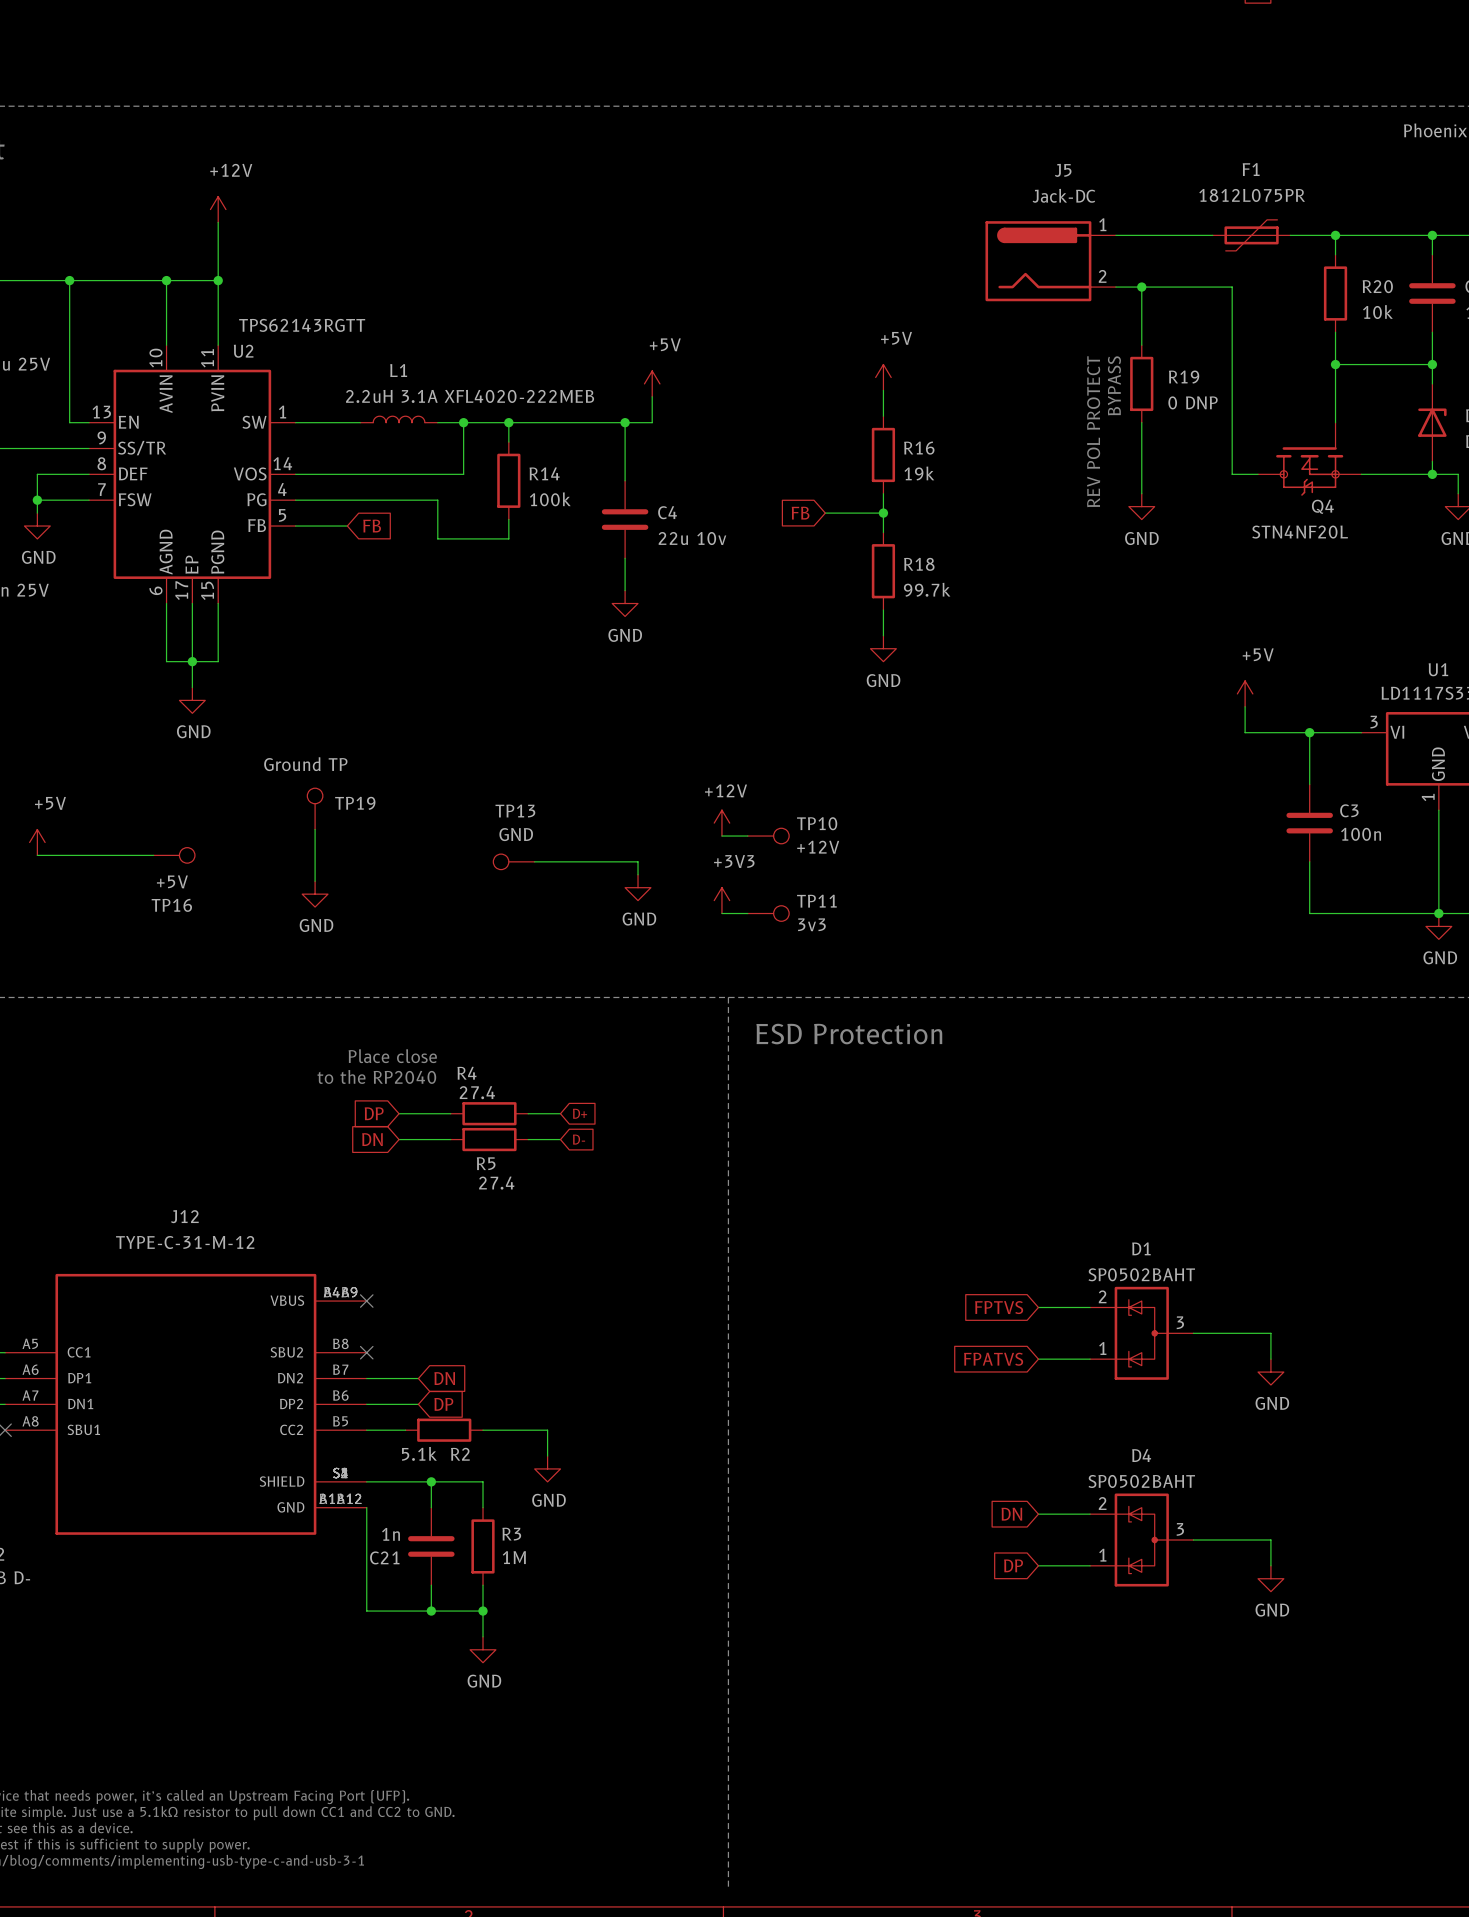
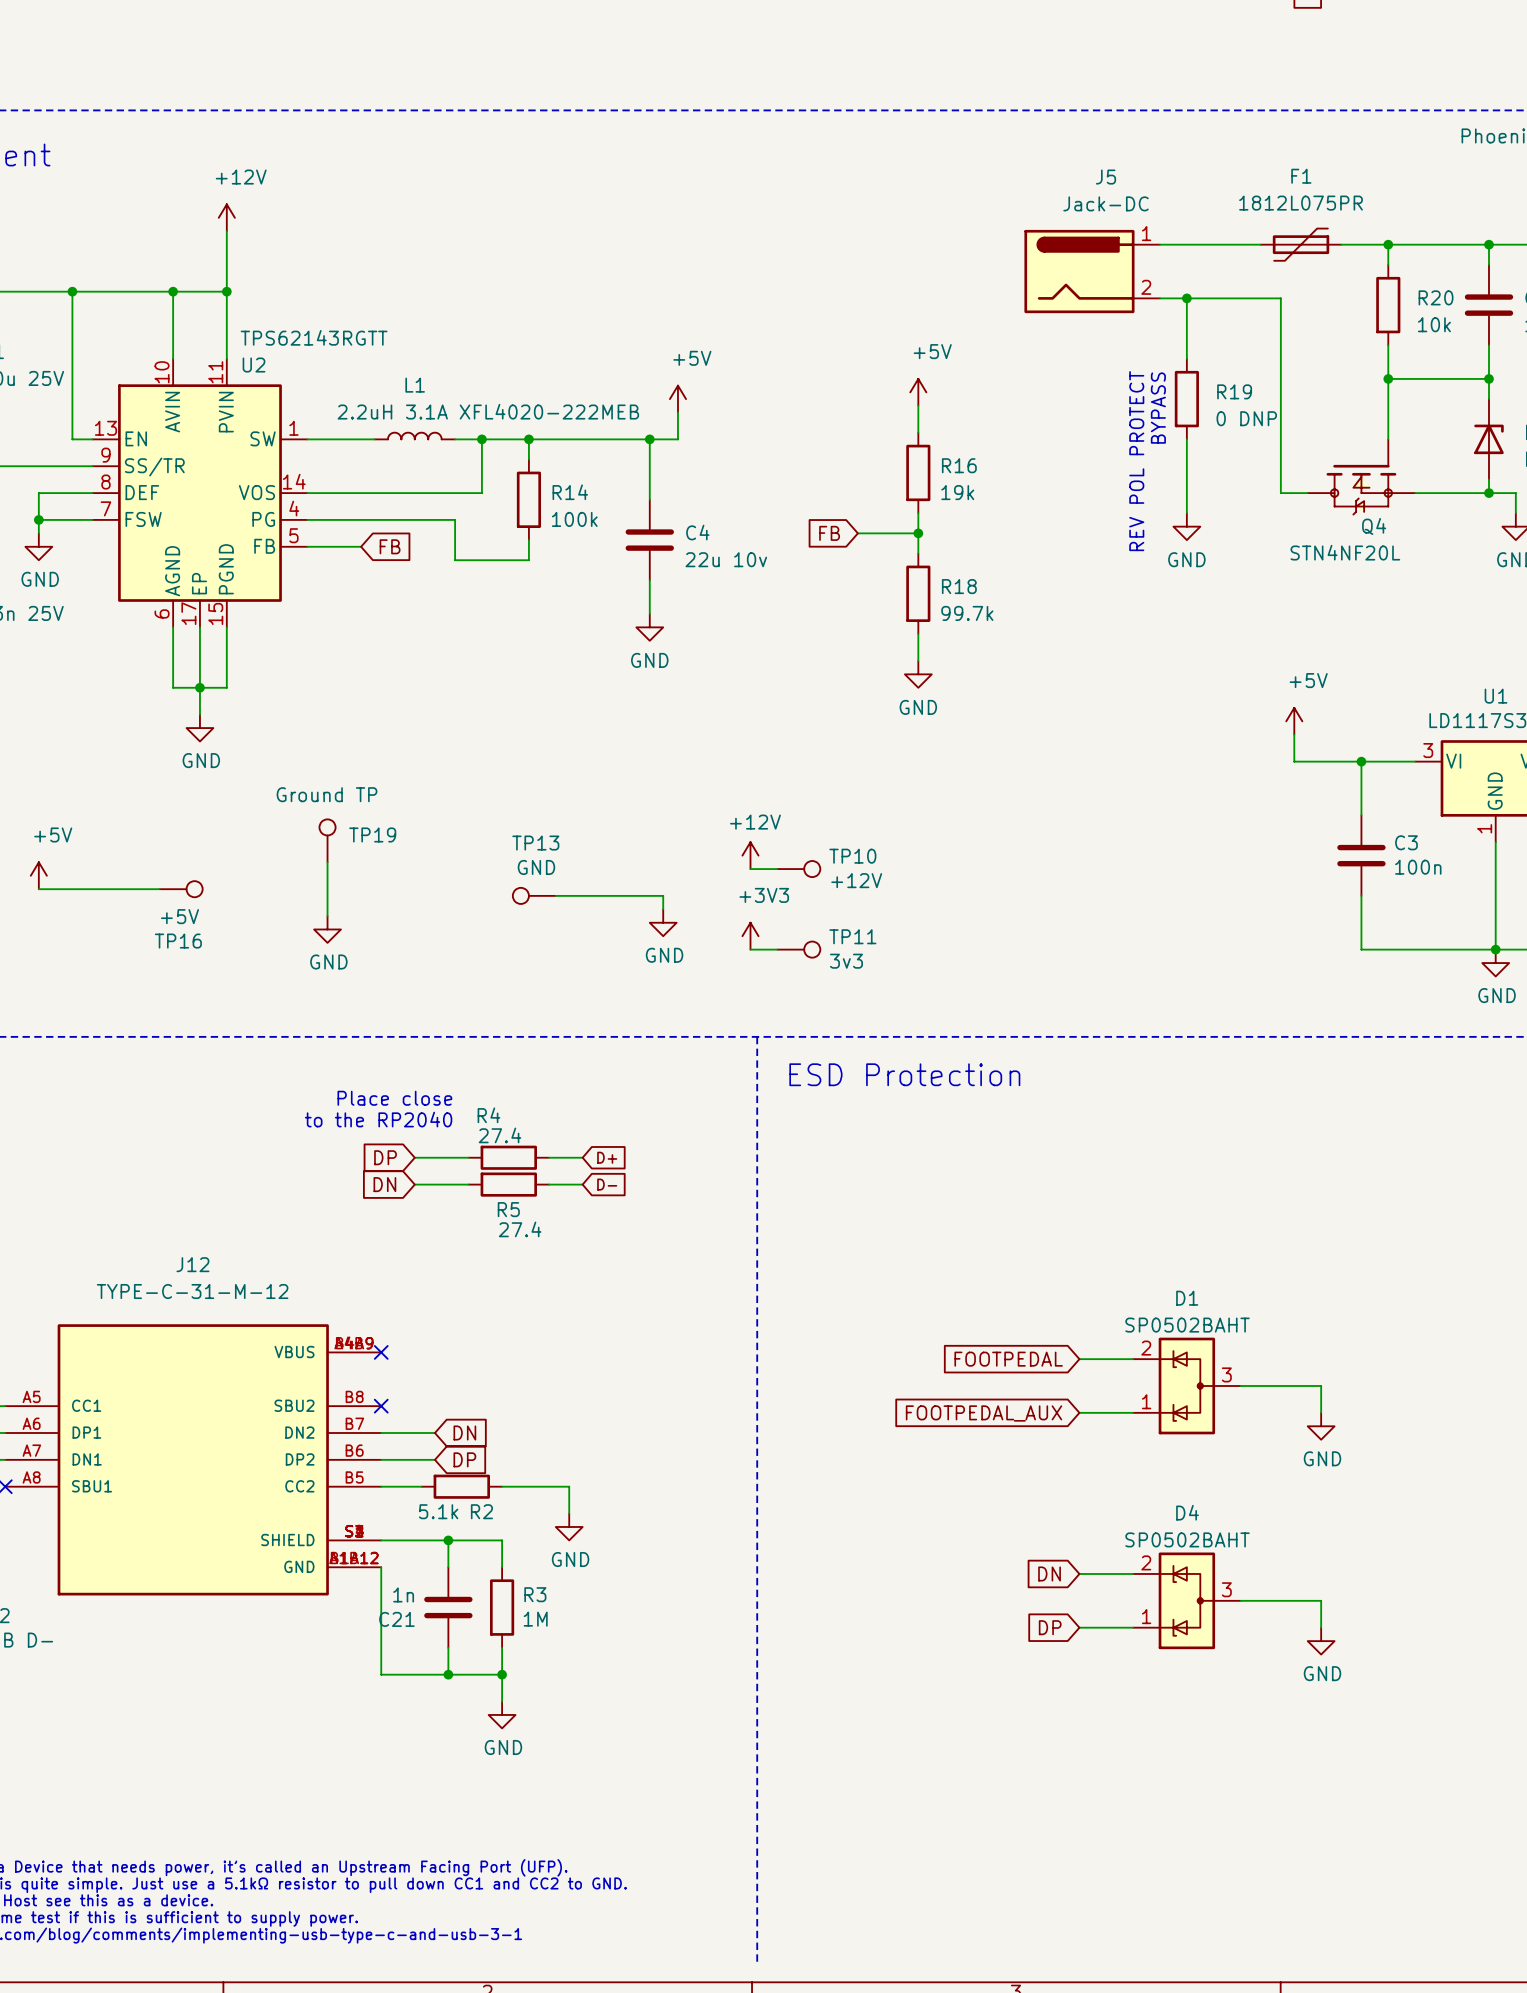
global label: FPTVS (999, 1307) -> FOOTPEDAL (1008, 1359)
global label: FPATVS (993, 1359) -> FOOTPEDAL_AUX (984, 1413)

